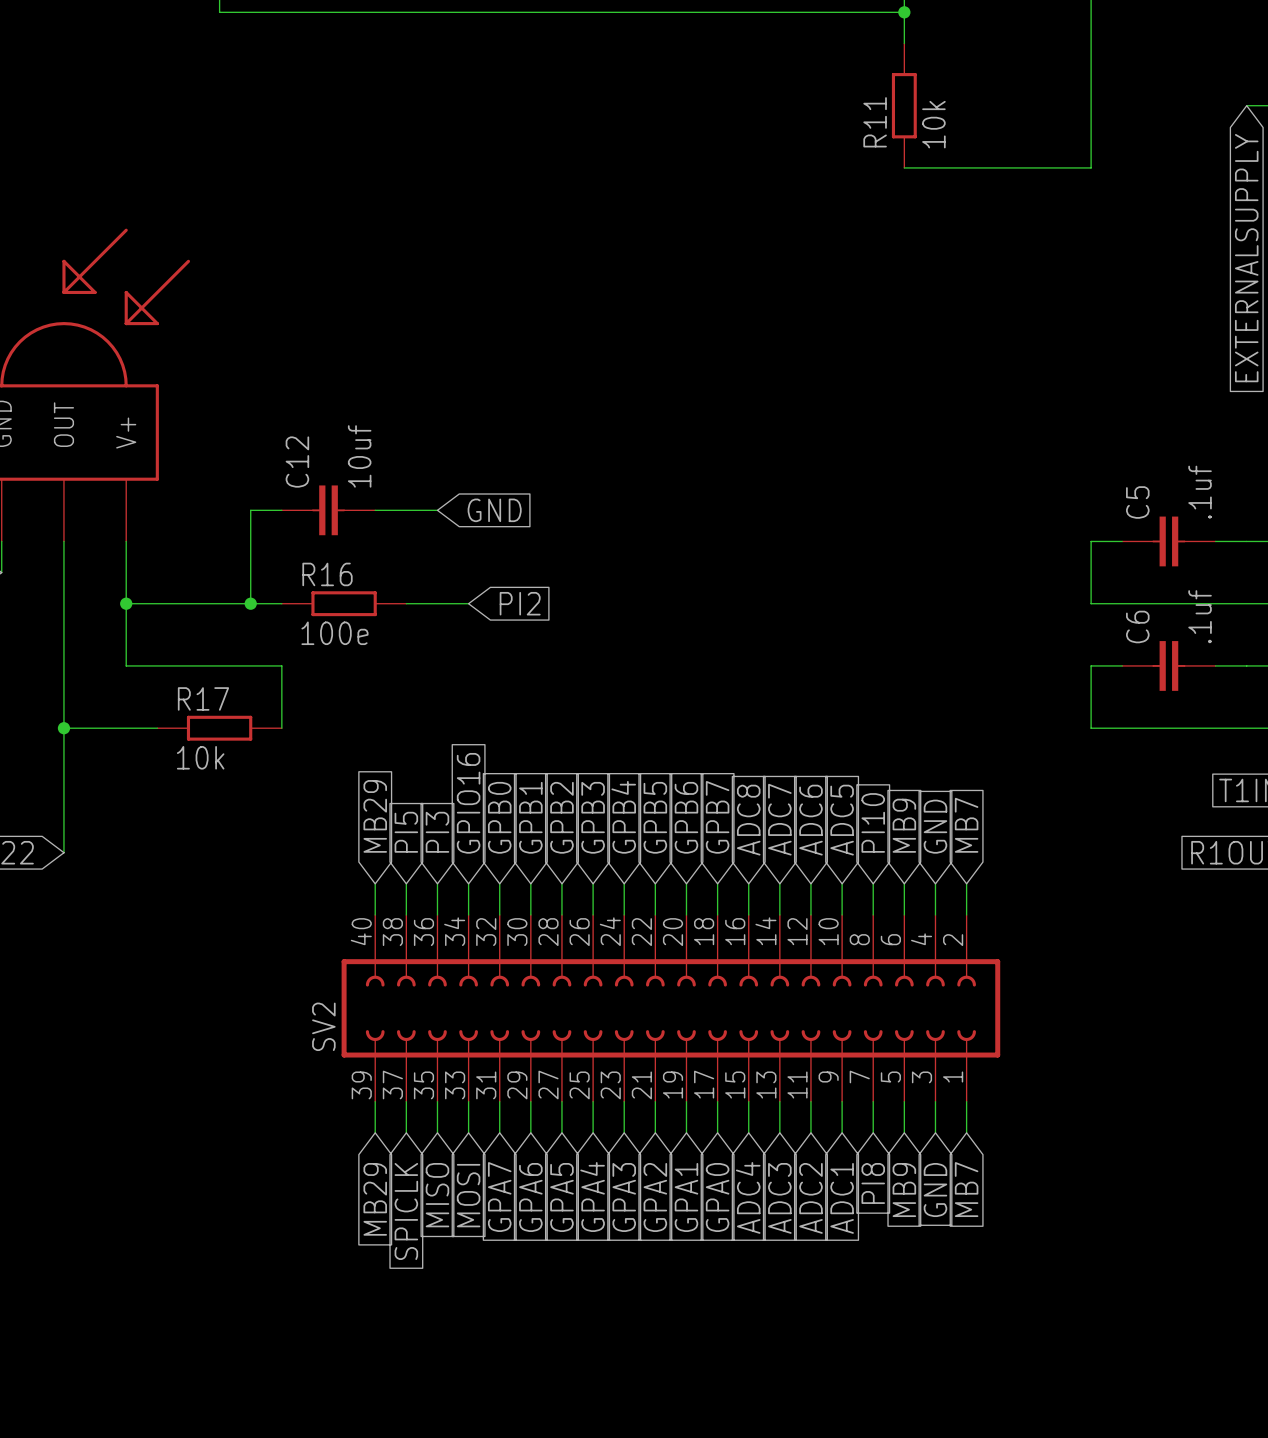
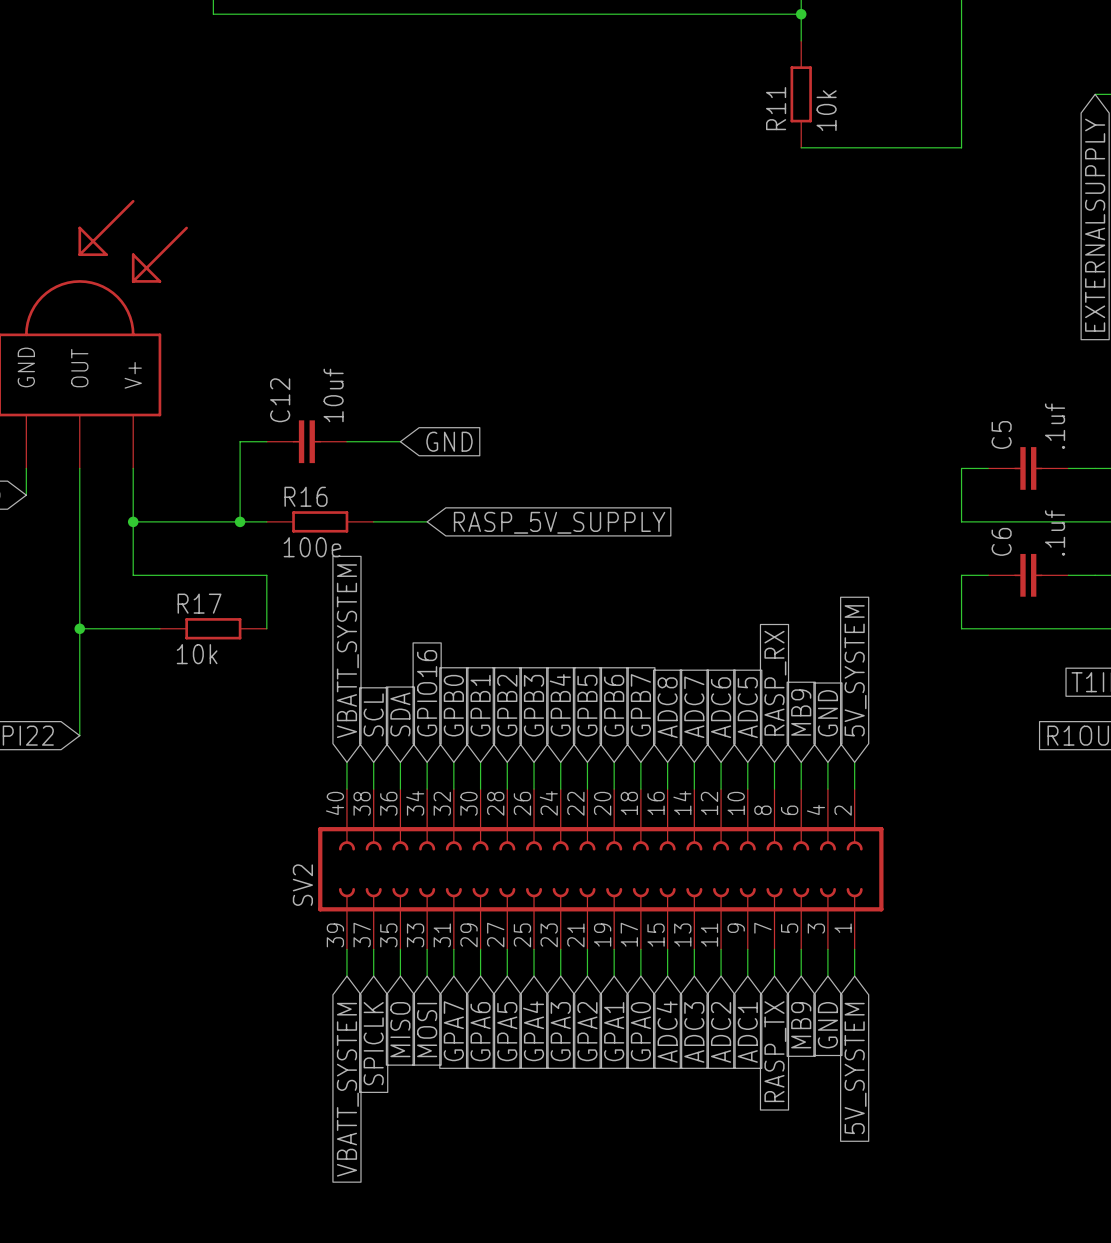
global label: PI2 (520, 603) -> RASP_5V_SUPPLY (559, 522)
global label: MB29 (375, 816) -> VBATT_SYSTEM (347, 651)
global label: PI10 (873, 822) -> RASP_RX (775, 683)
global label: MB7 (966, 825) -> 5V_SYSTEM (855, 670)
global label: PI5 (406, 832) -> SCL (373, 714)
global label: PI3 (437, 832) -> SDA (400, 714)
global label: PI8 (873, 1183) -> RASP_TX (775, 1051)
global label: MB7 (966, 1189) -> 5V_SYSTEM (855, 1068)
global label: MB29 (375, 1199) -> VBATT_SYSTEM (347, 1089)

